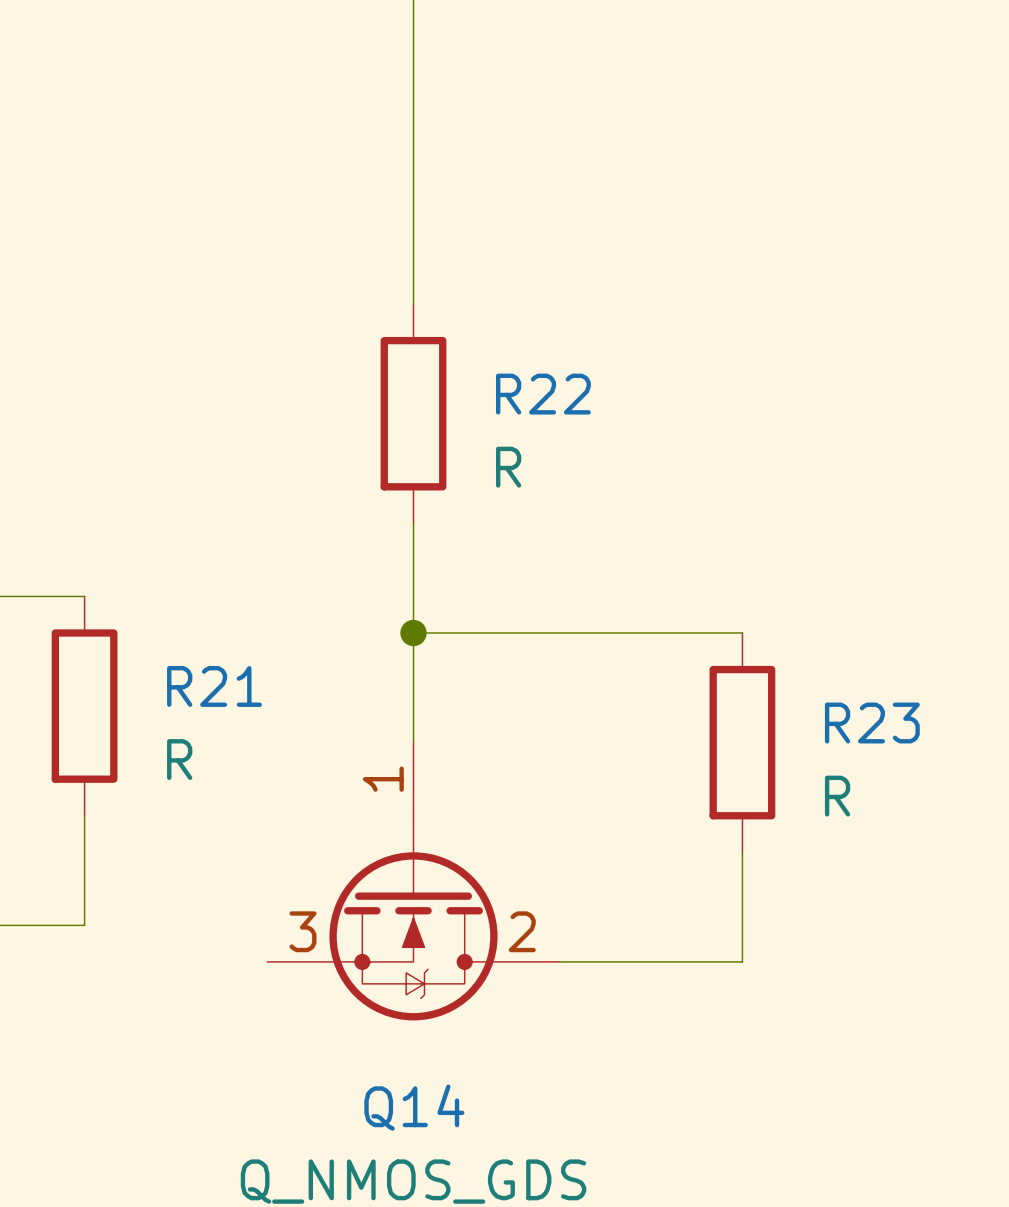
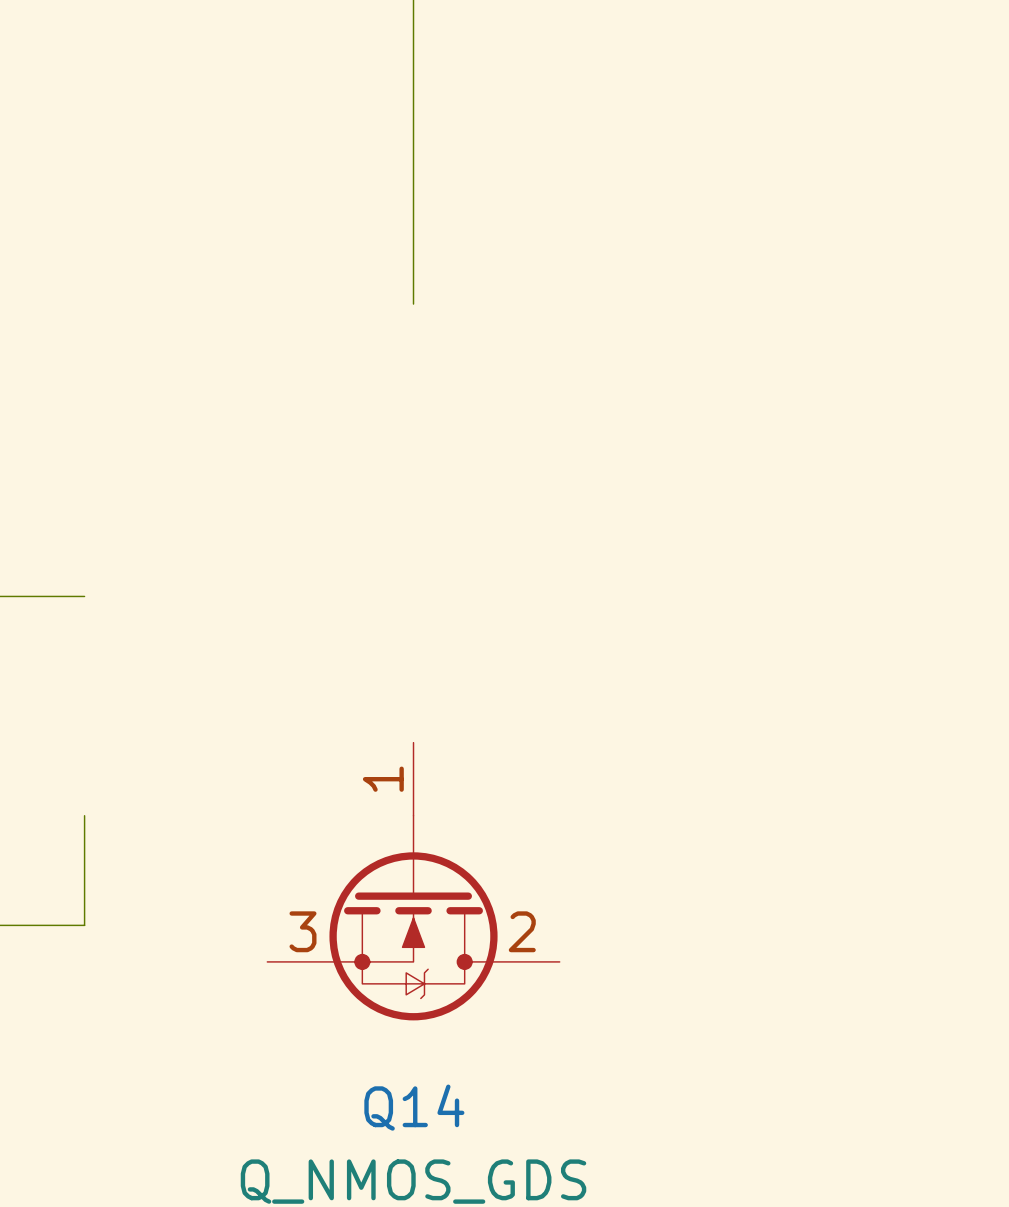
R22: R (413, 413) -> none
wire: (413, 523) (413, 742) -> none
wire: (413, 633) (742, 633) -> none
junction: (413, 633) -> none
R21: R (84, 706) -> none
R23: R (742, 742) -> none
wire: (742, 852) (742, 961) (559, 961) -> none

